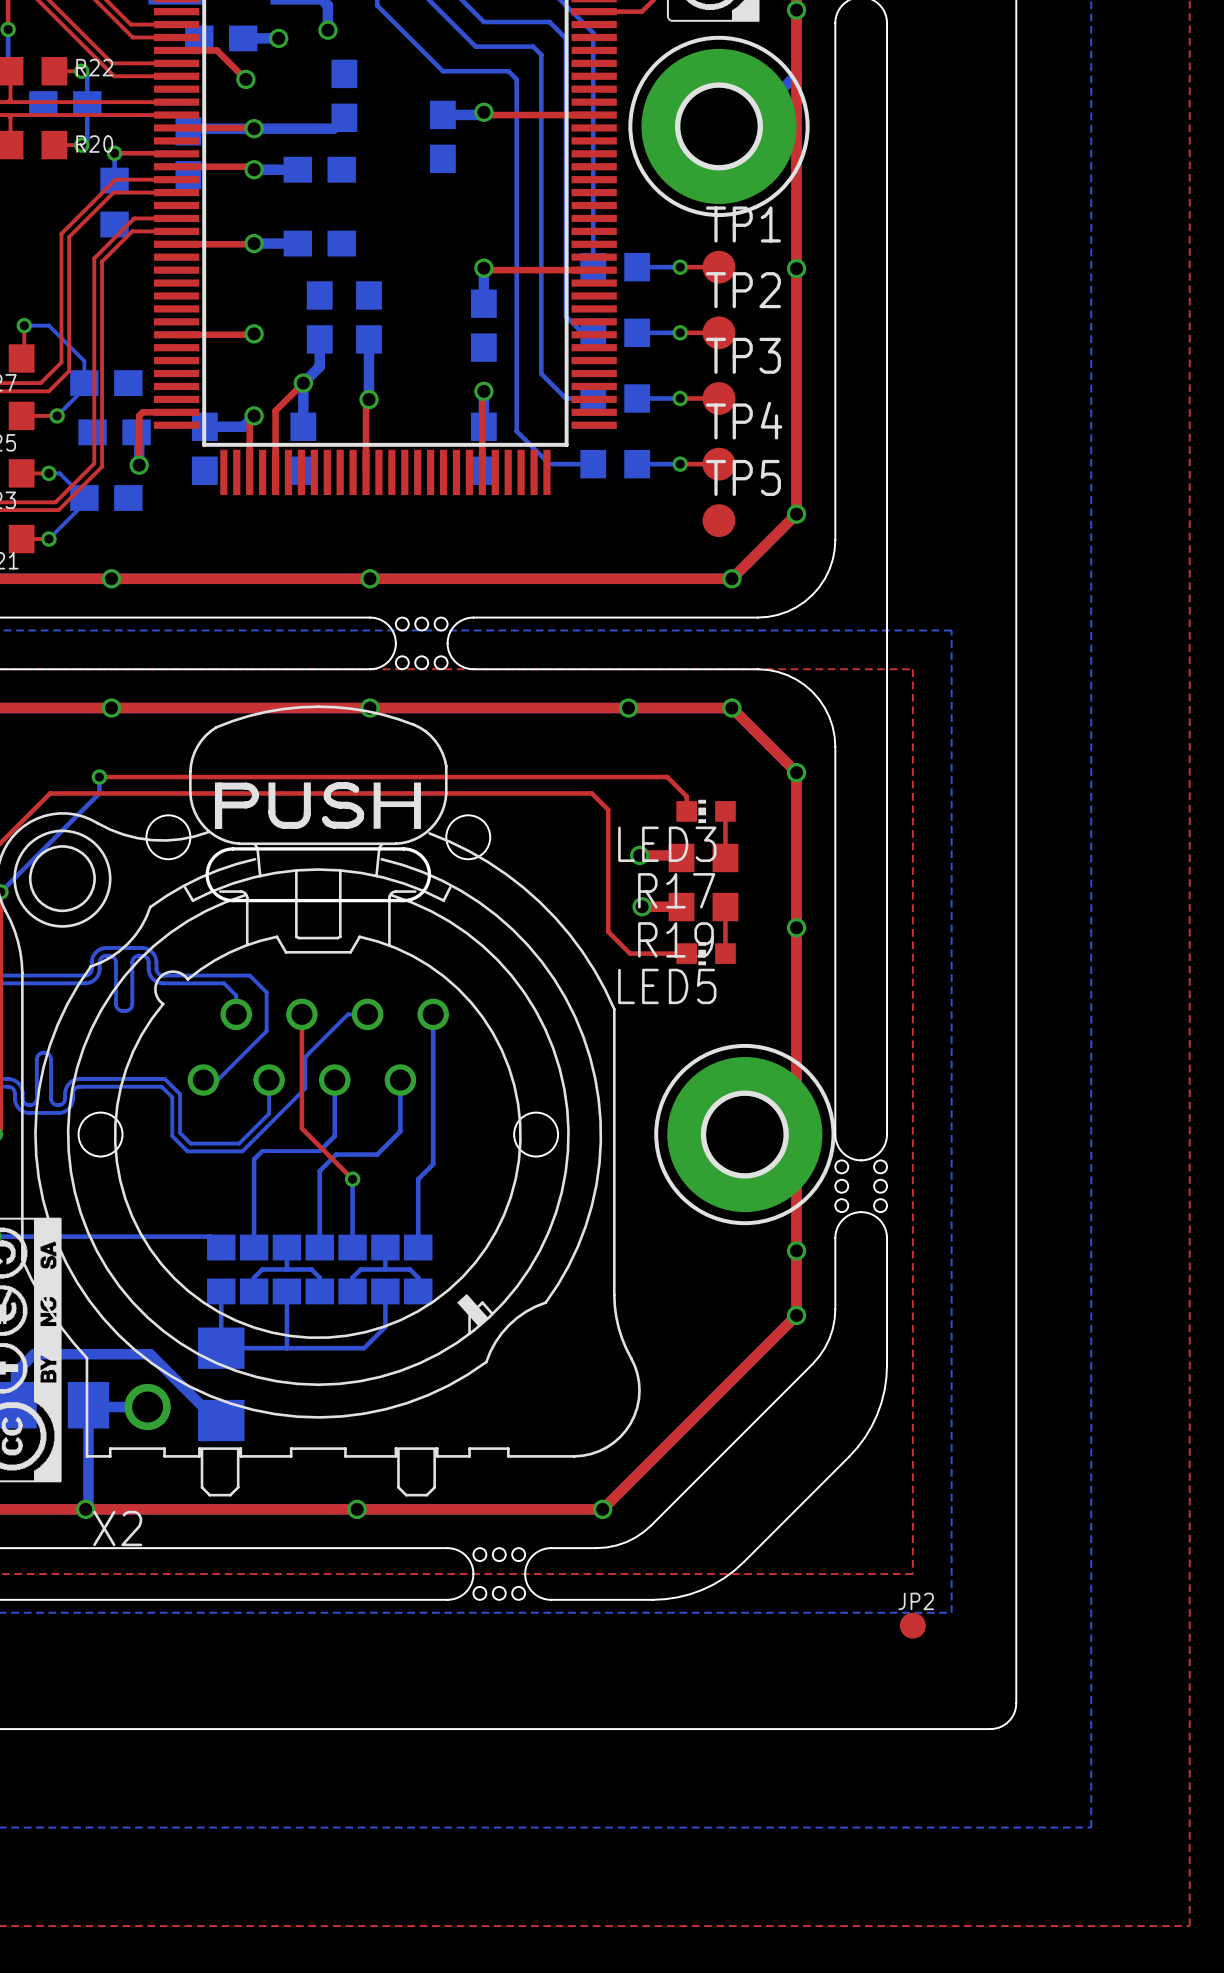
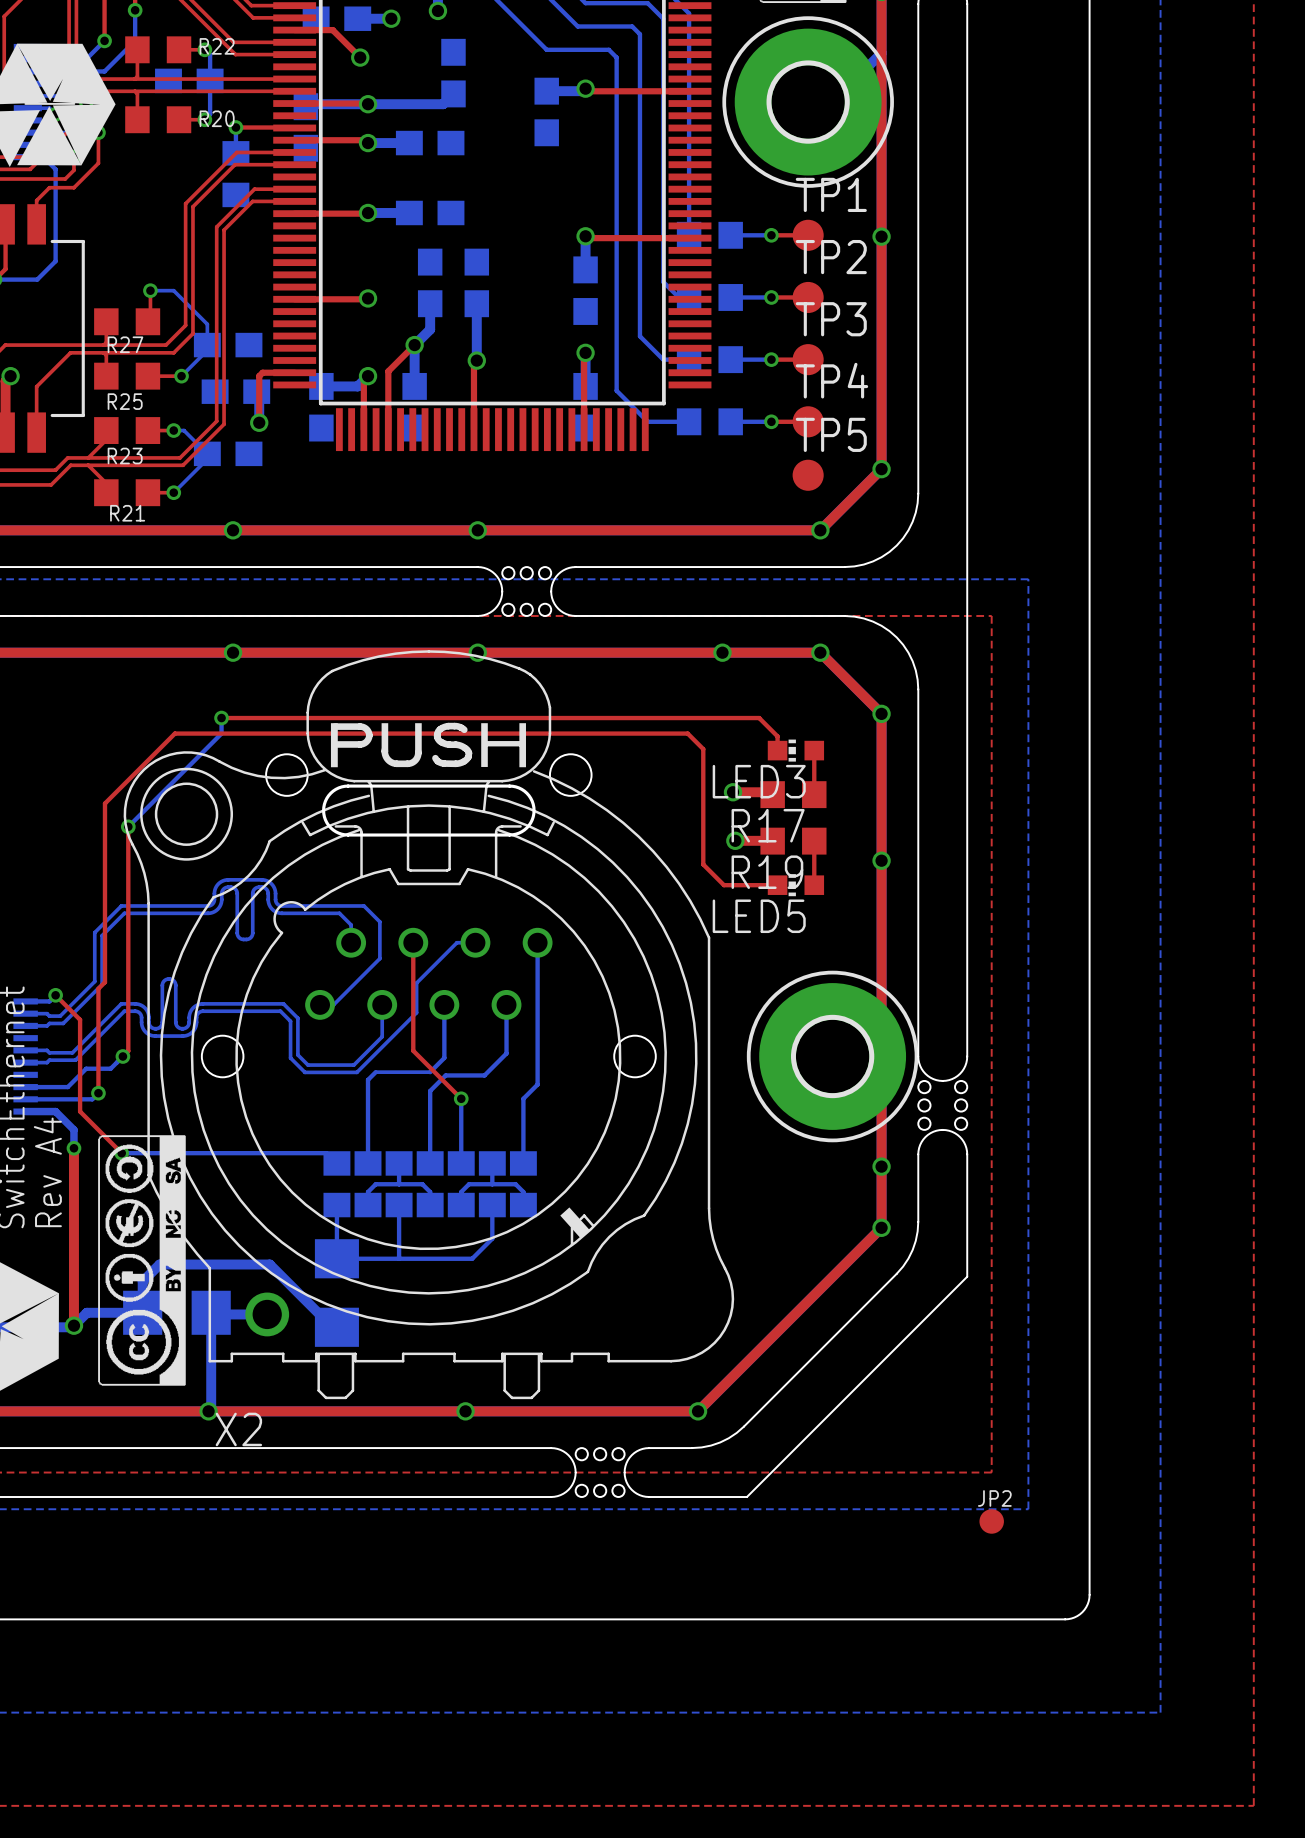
board edge: (887, 1365) (881, 1402) (865, 1437) (849, 1456) (743, 1561) (724, 1578) (701, 1590) (677, 1597) (652, 1599) -> (967, 1275) (745, 1497)

